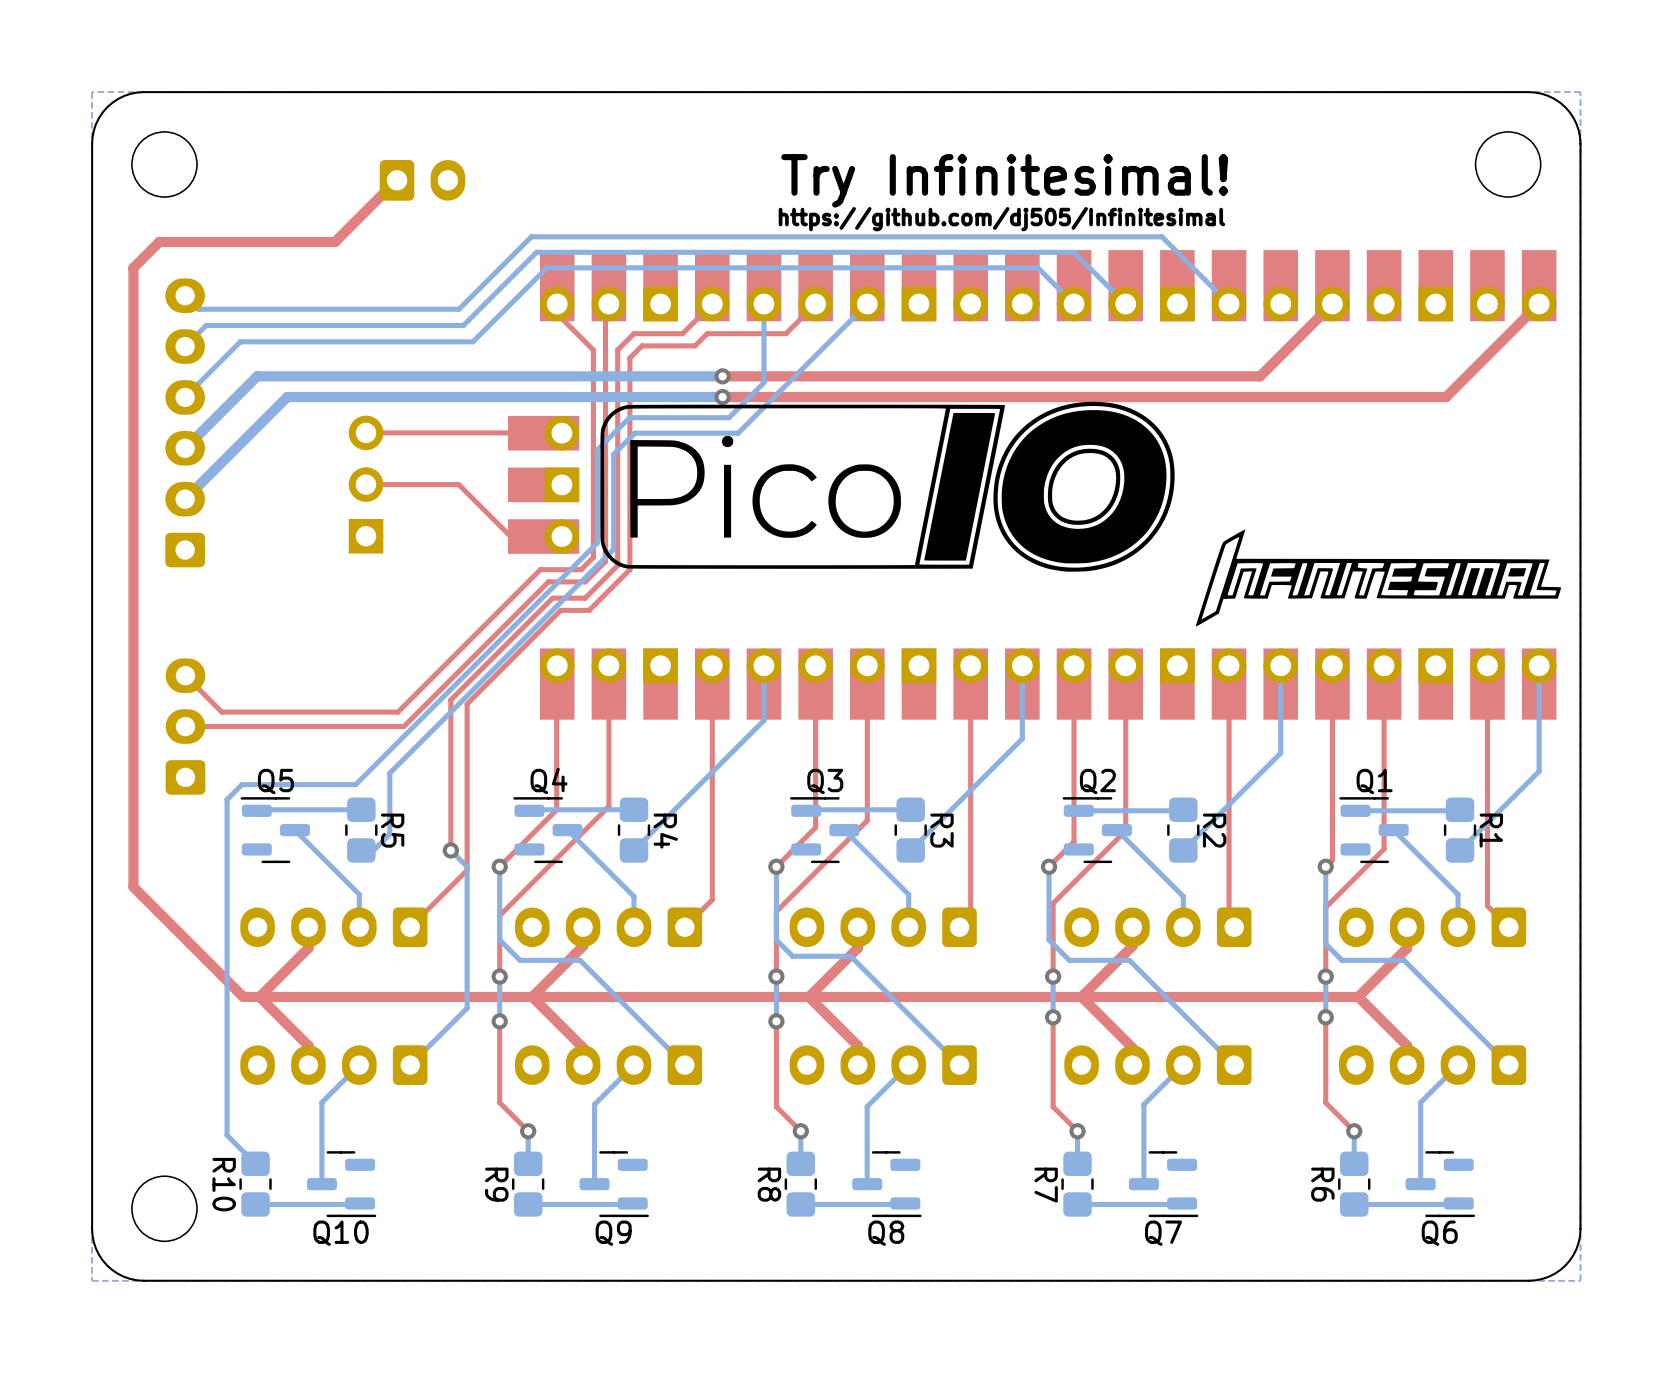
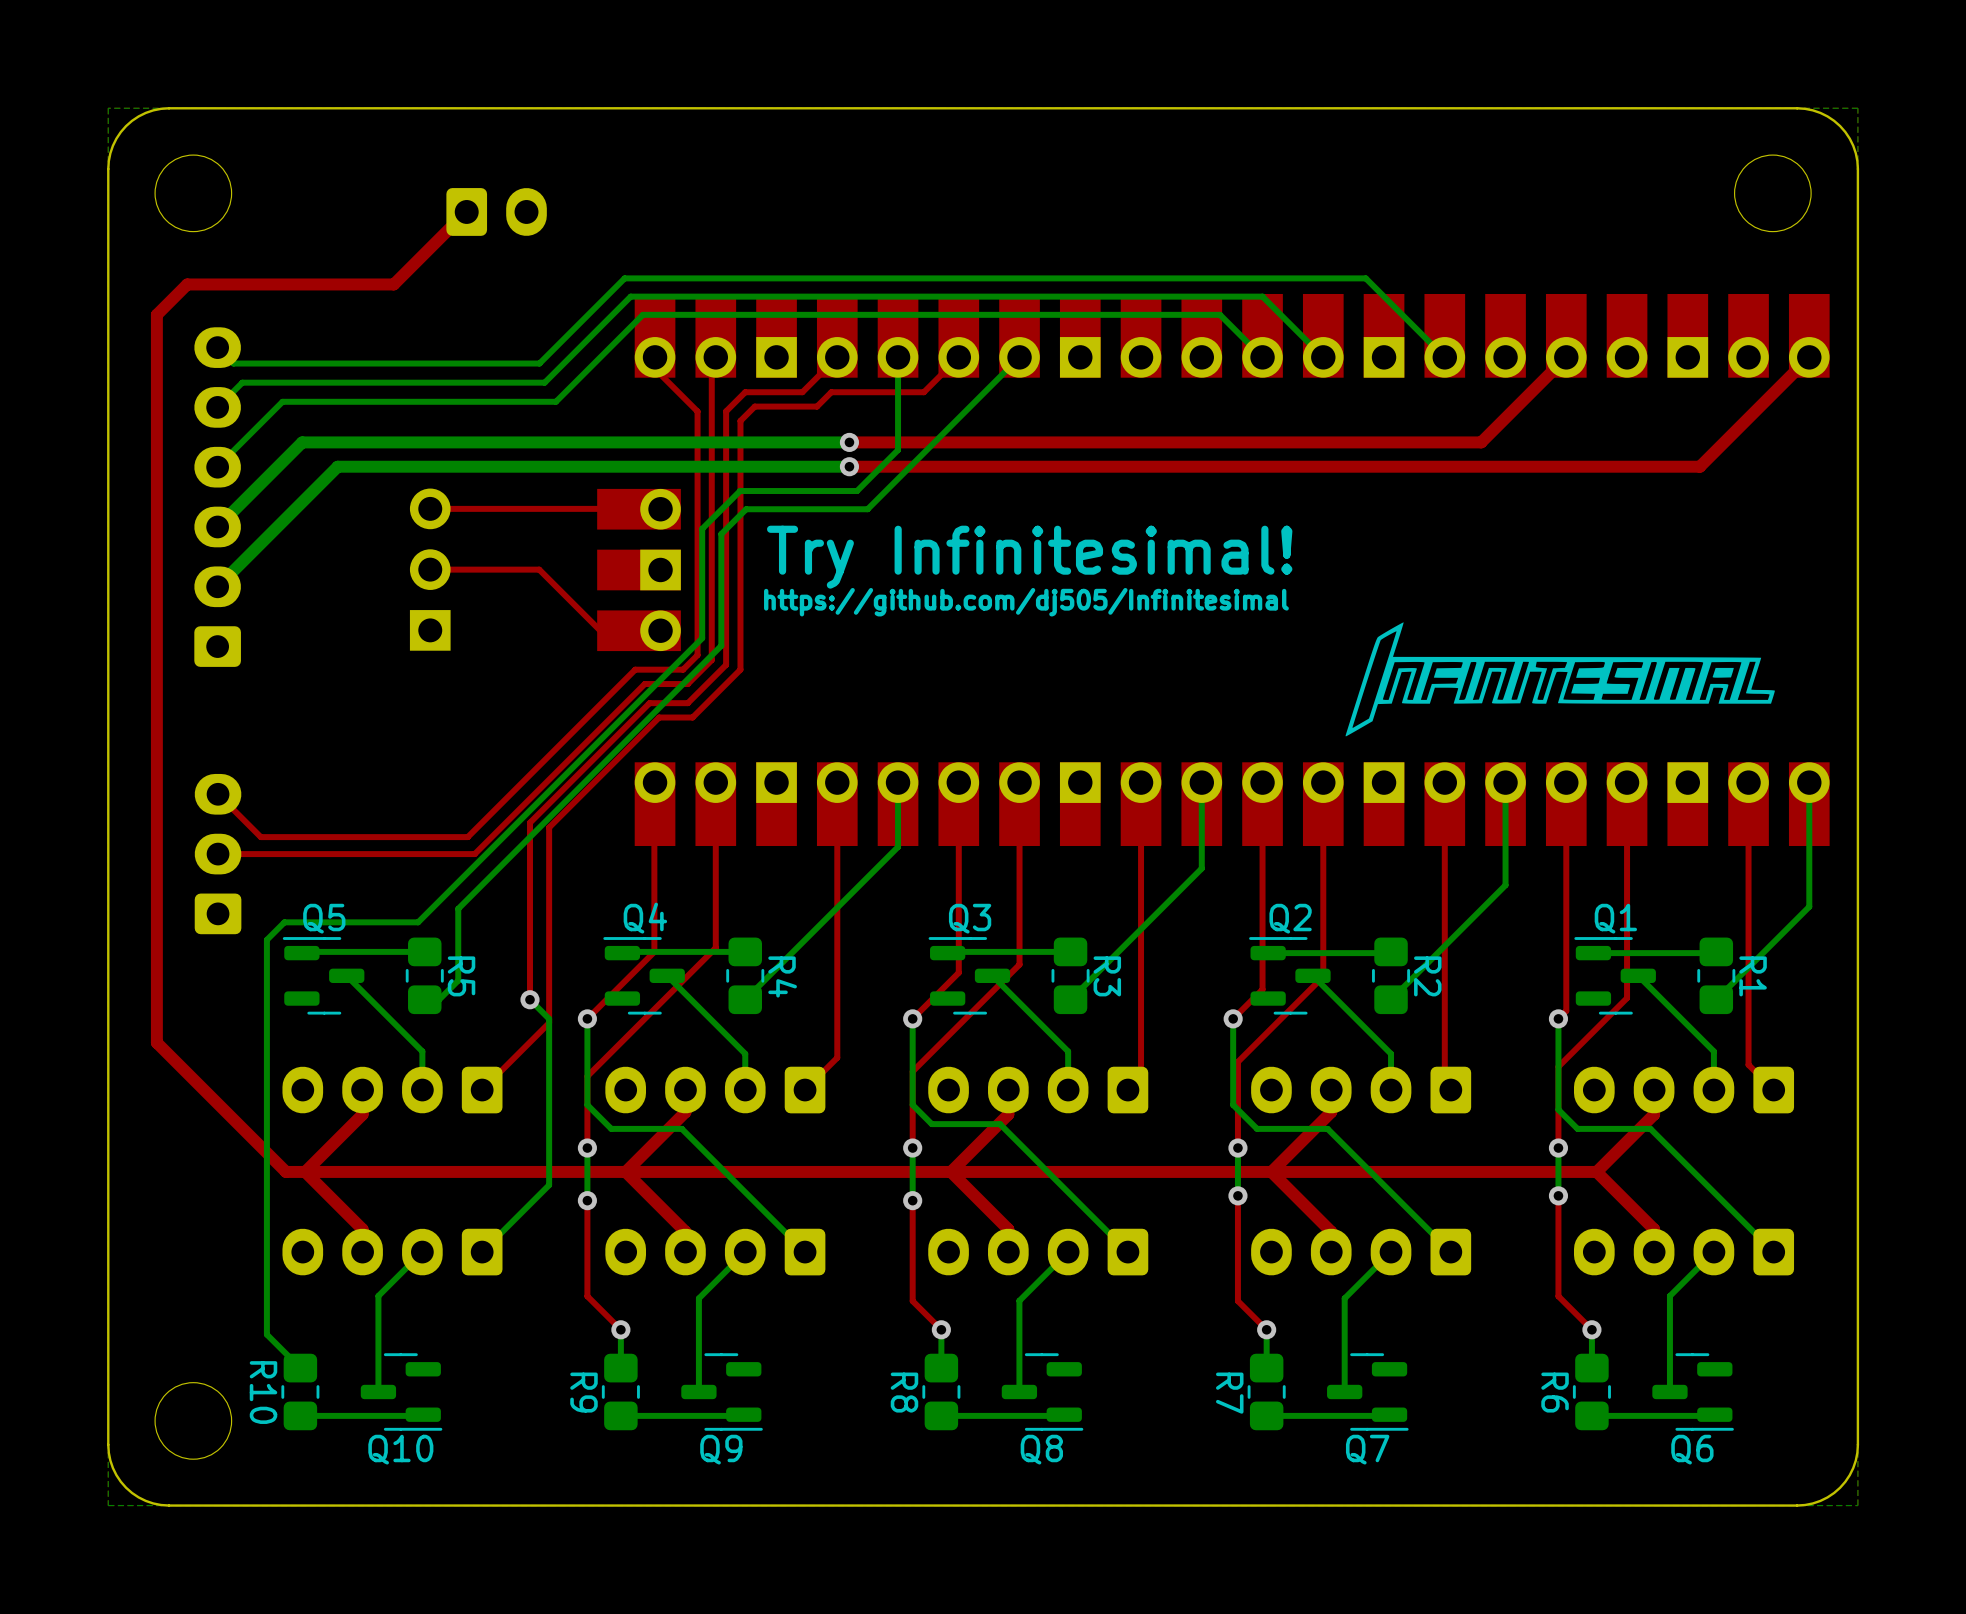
text position: Try Infinitesimal! (1004, 180) -> Try Infinitesimal! (1029, 557)
text position: https://github.com/dj505/Infinitesimal (1001, 219) -> https://github.com/dj505/Infinitesimal (1026, 602)
drawing: [600, 401, 1175, 572] -> none
drawing position: (1378, 577) -> (1560, 679)

